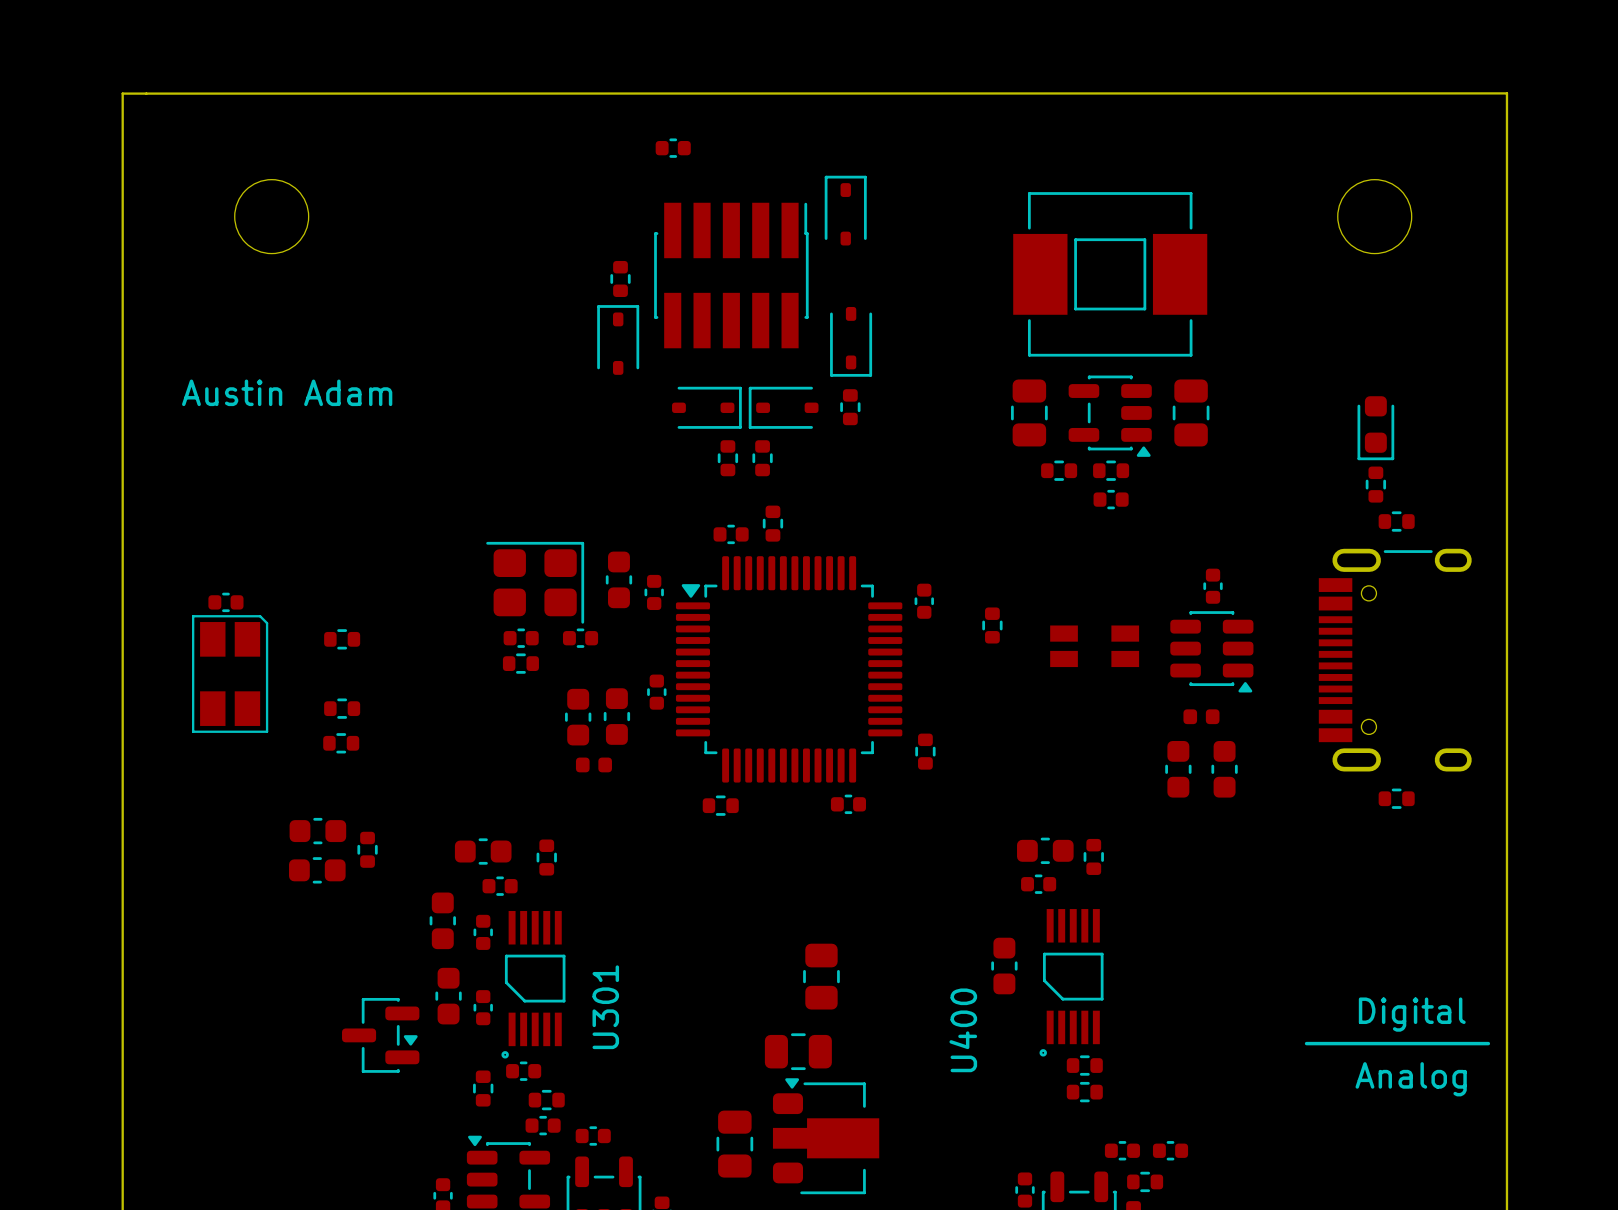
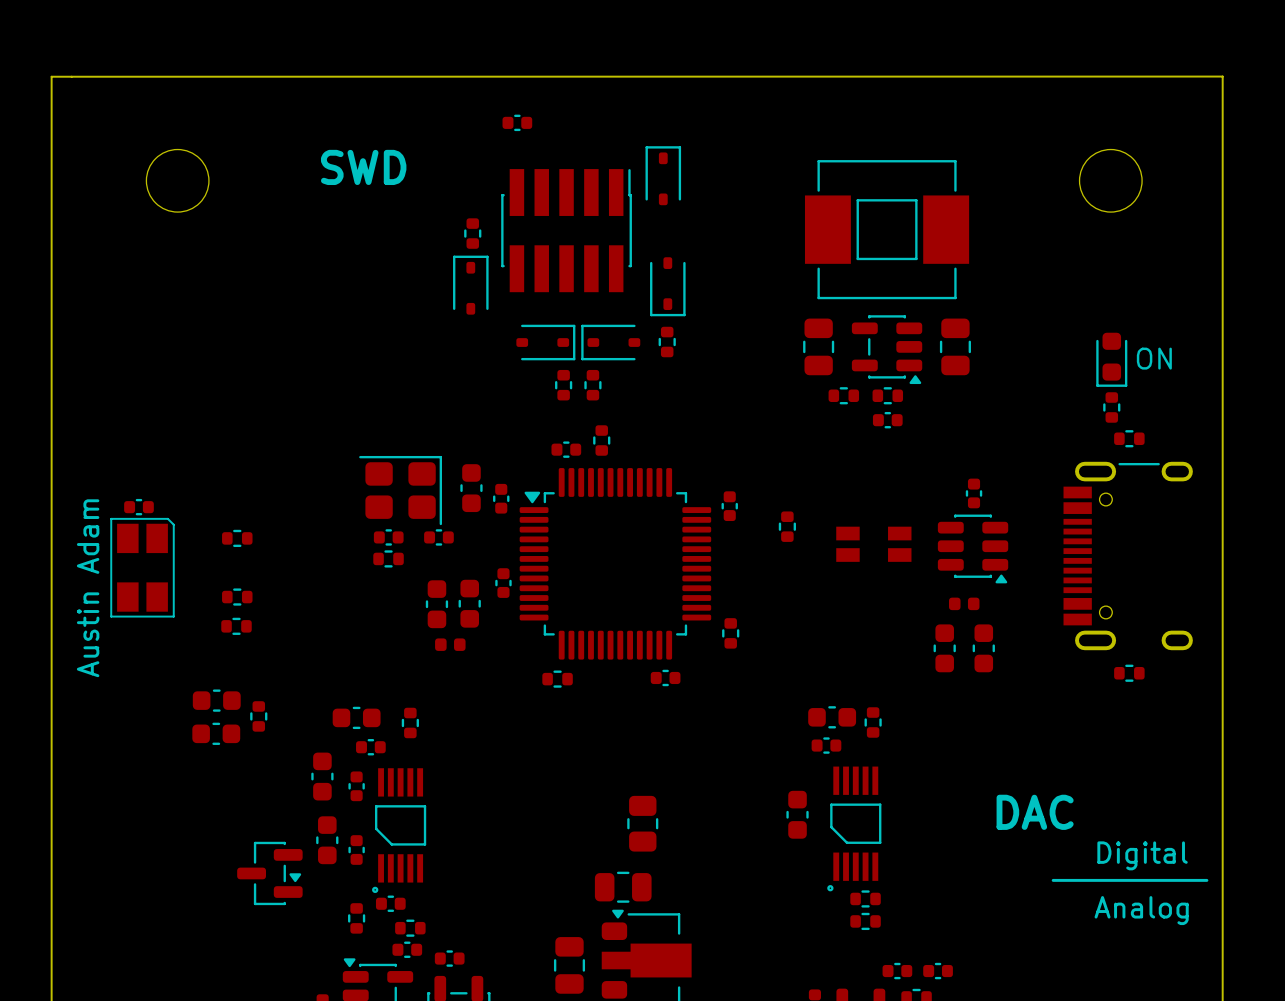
text: none -> SWD (363, 167)
text rotation: 0° (287, 392) -> 90° counterclockwise (88, 588)
text position: Austin Adam (287, 392) -> Austin Adam (88, 588)
text: none -> ON (1154, 358)
text: none -> DAC (1035, 812)
U301 name: U301 (605, 1007) -> none
U400 name: U400 (963, 1030) -> none

